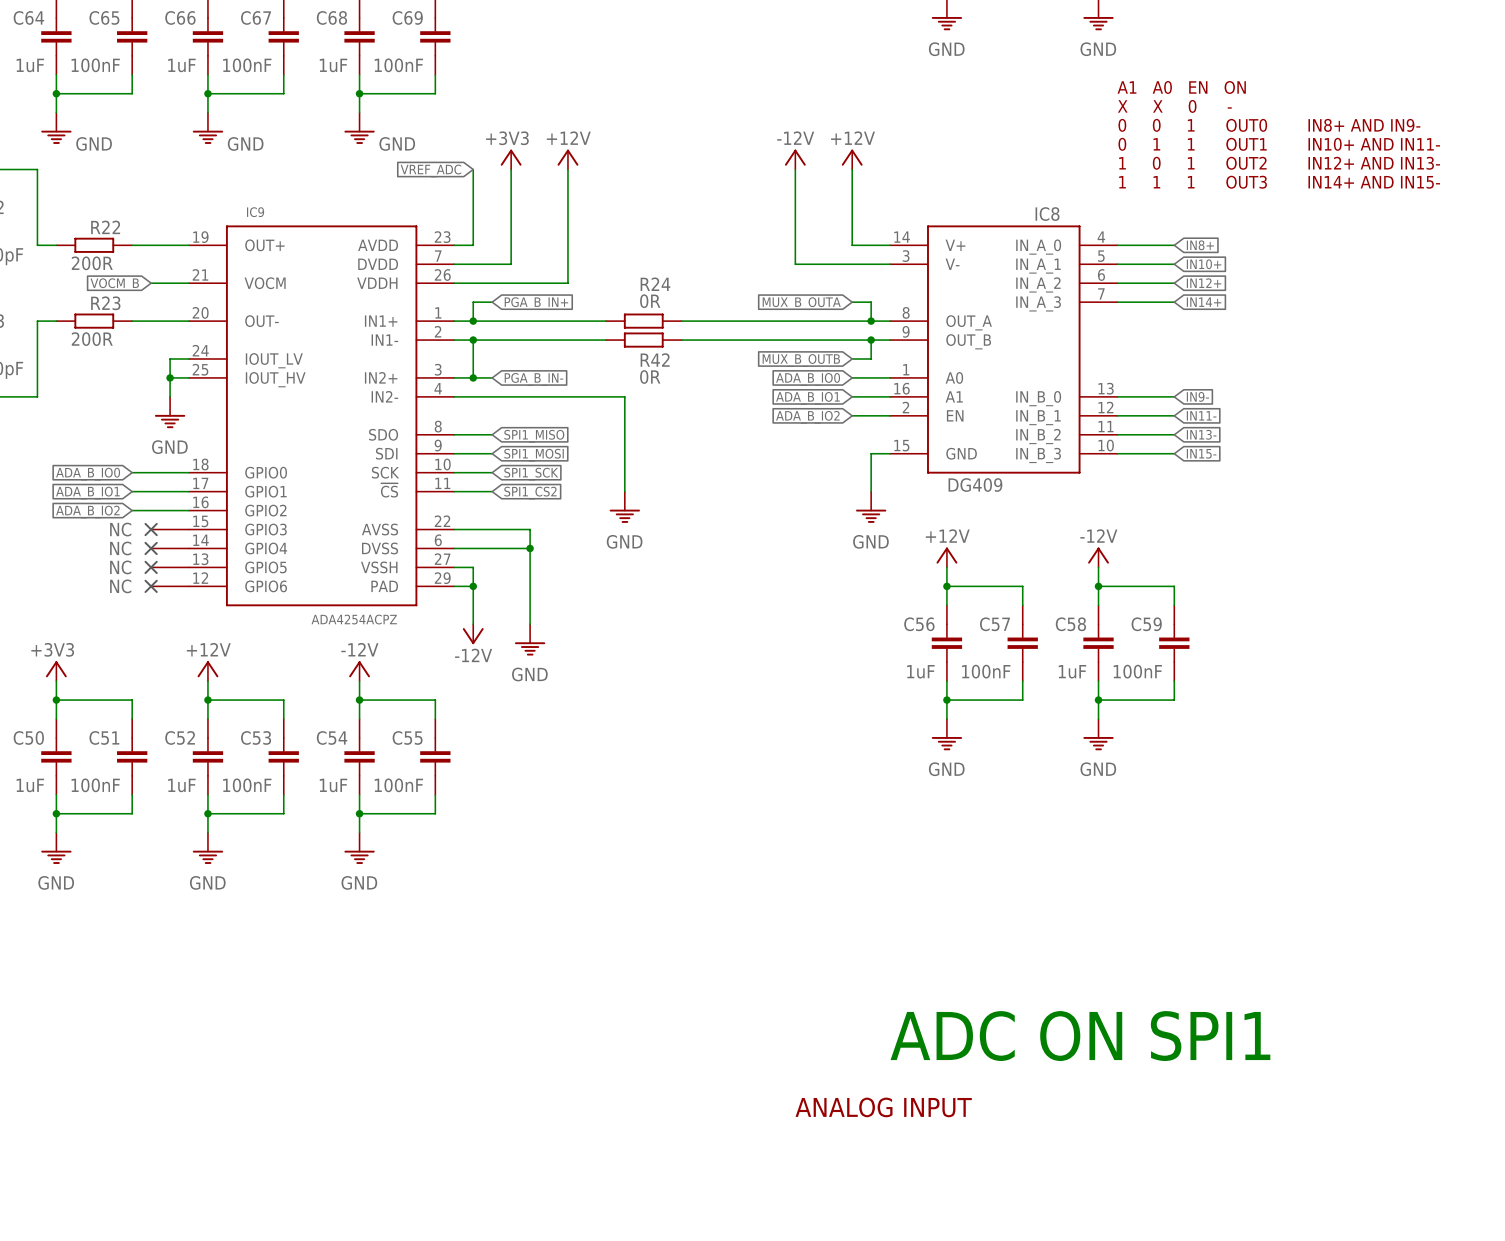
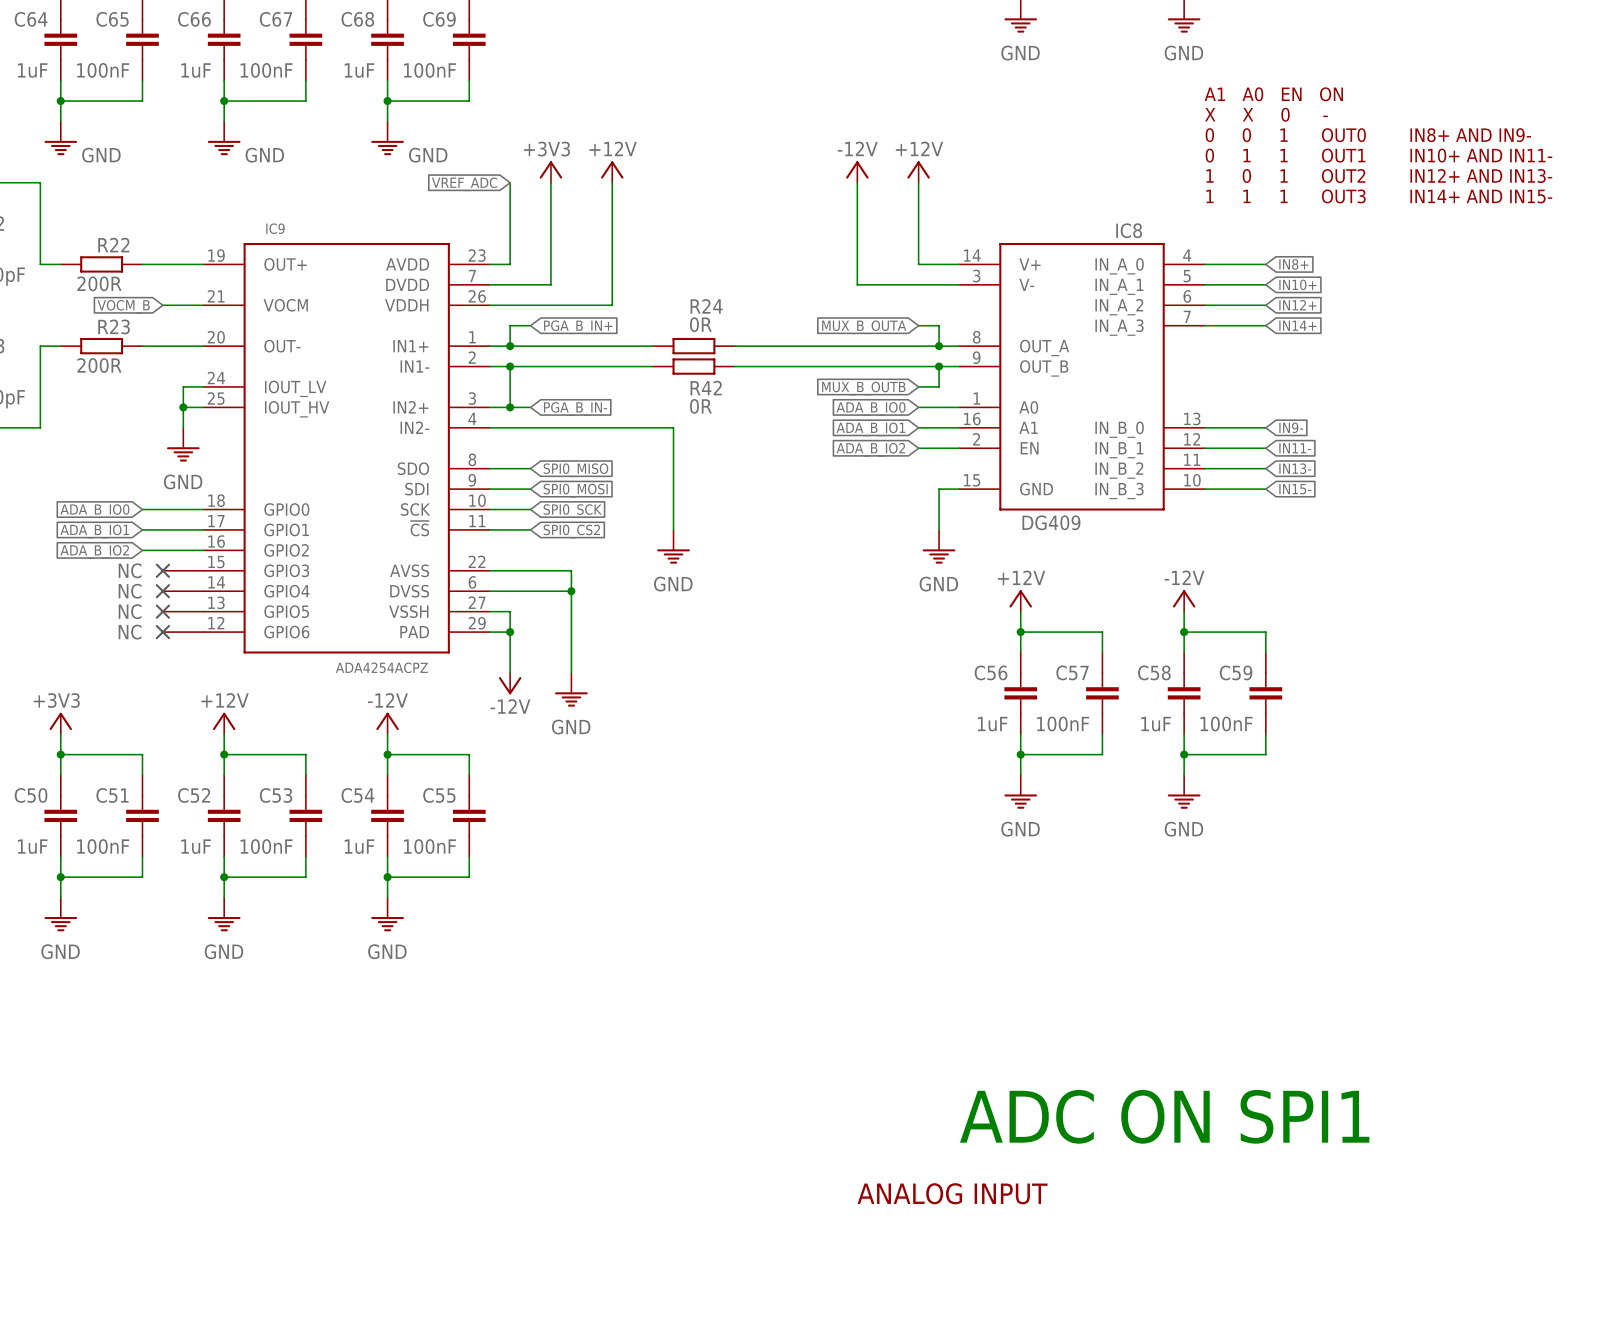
global label: SPI1_MISO (534, 436) -> SPI0_MISO (575, 470)
global label: SPI1_MOSI (534, 455) -> SPI0_MOSI (575, 490)
global label: SPI1_SCK (531, 474) -> SPI0_SCK (572, 511)
global label: SPI1_CS2 (530, 493) -> SPI0_CS2 (571, 531)

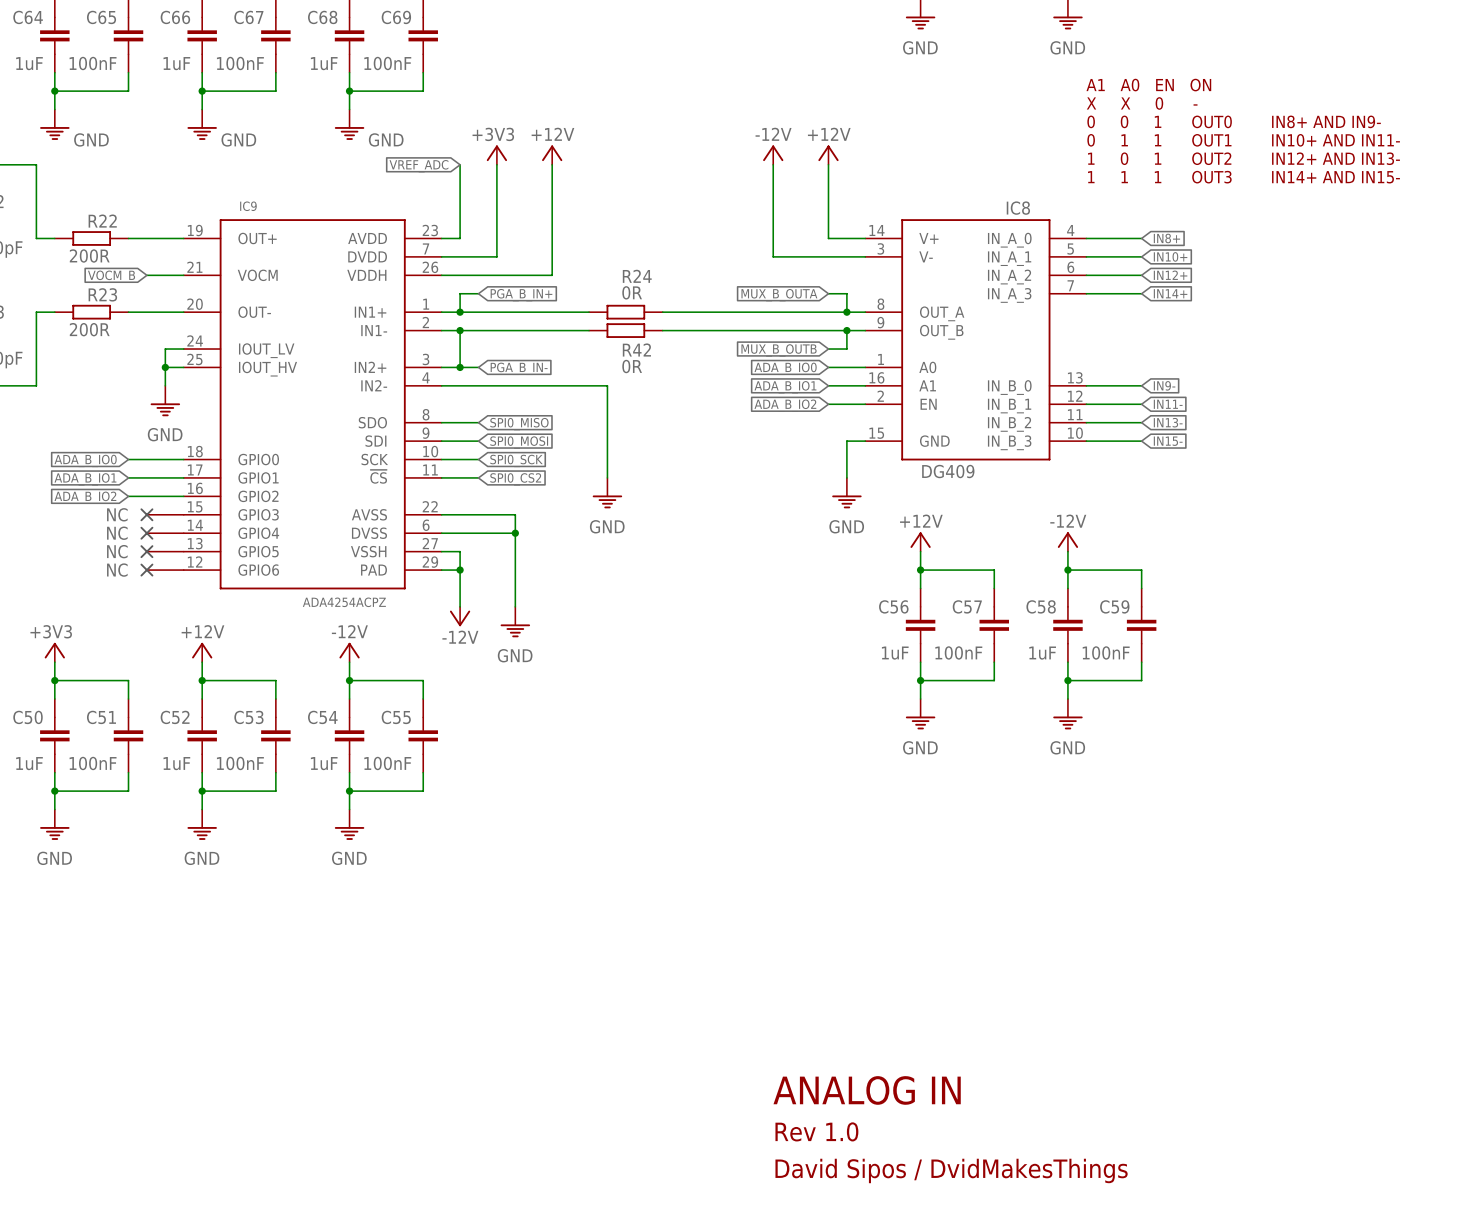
text: ADC ON SPI1 (1164, 1116) -> none
text: ANALOG INPUT (952, 1193) -> ANALOG IN (867, 1090)
text: none -> Rev 1.0 (816, 1131)
text: none -> David Sipos / DvidMakesThings (951, 1170)

